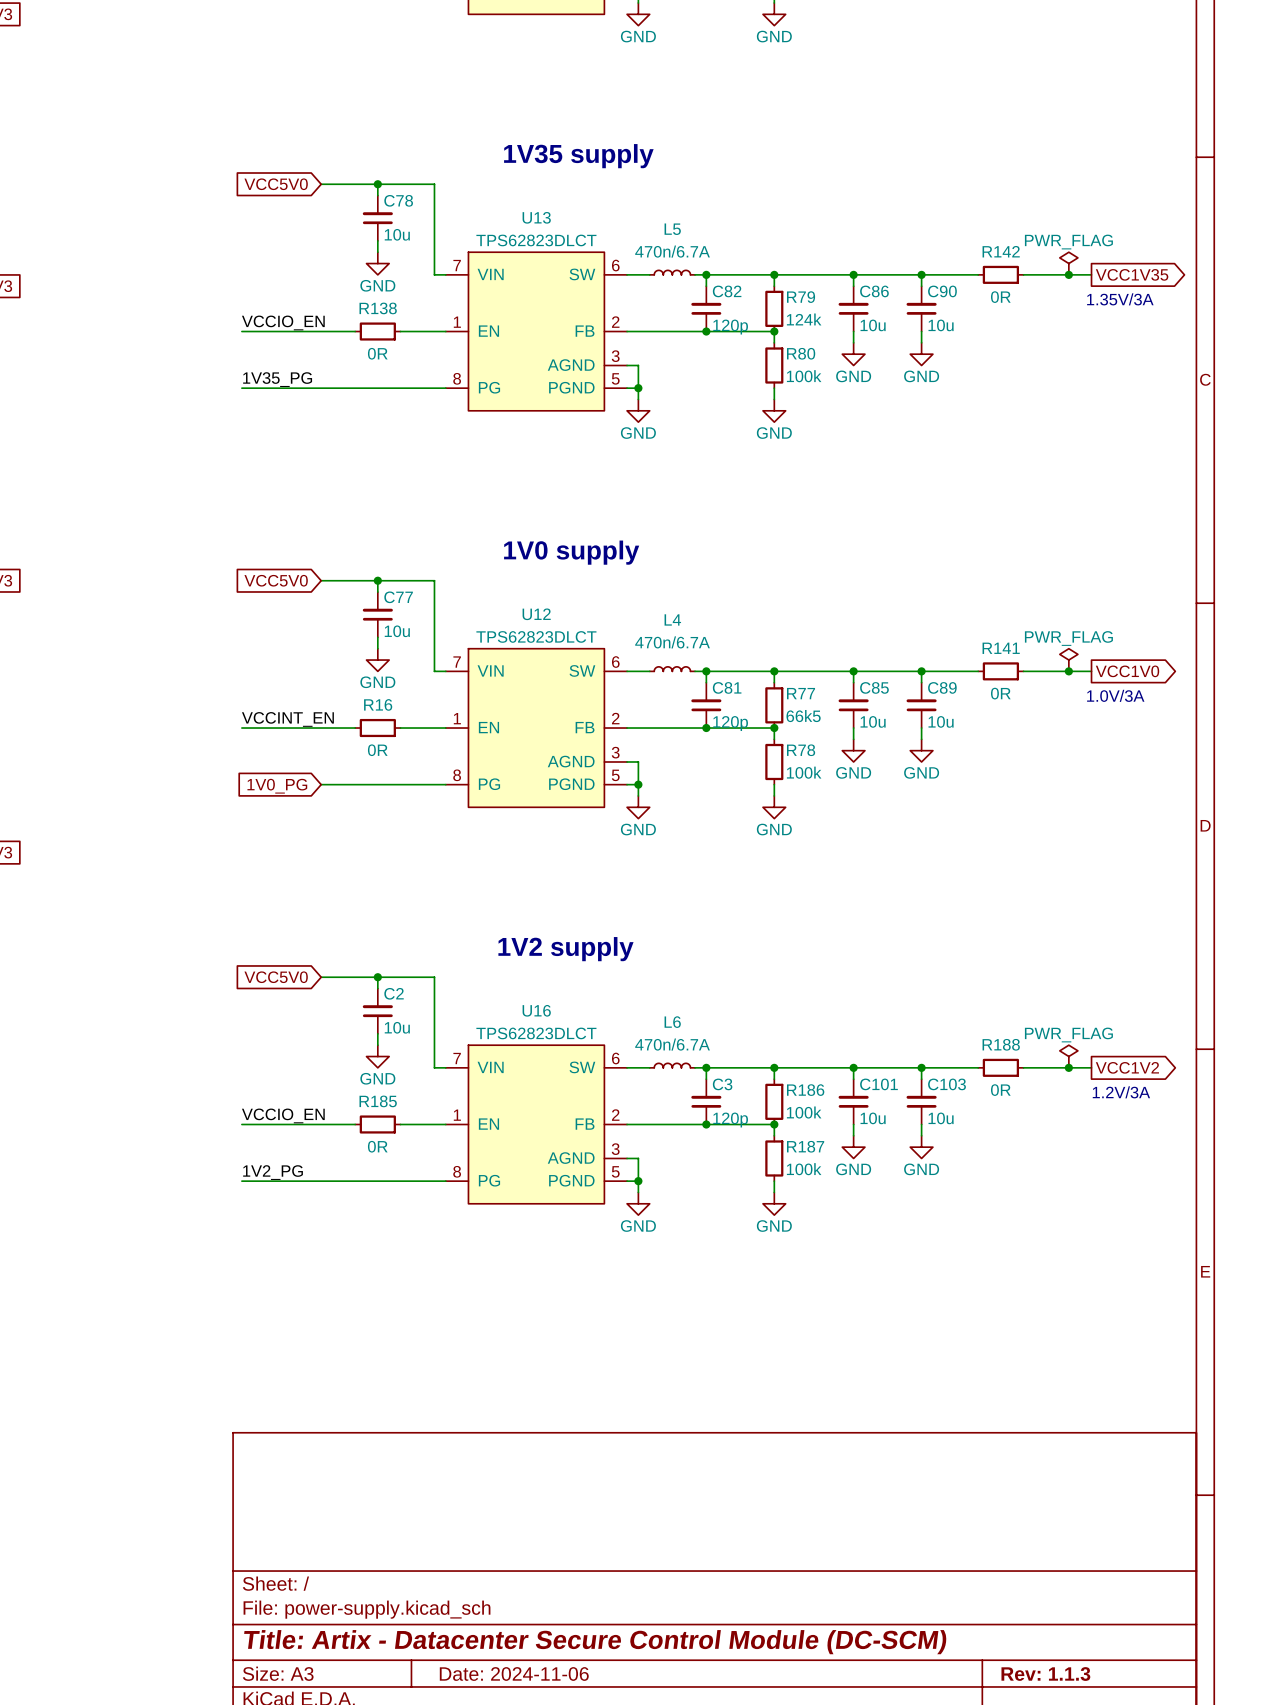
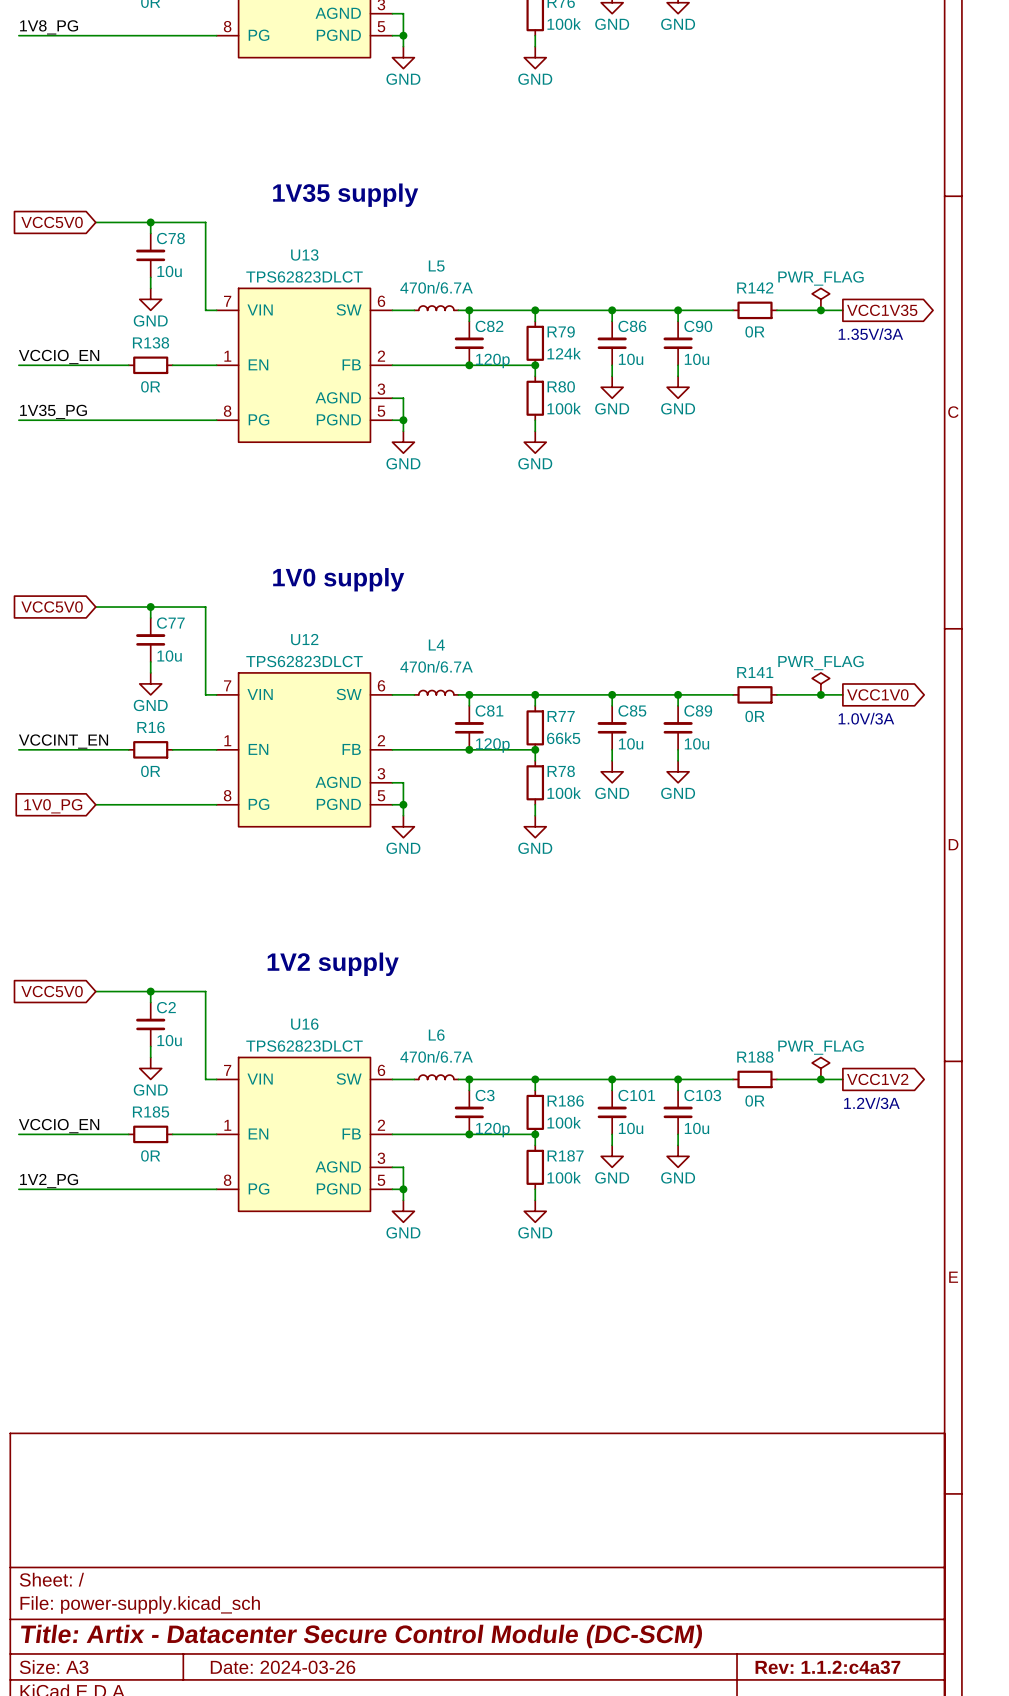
title block: Date: 2024-11-06 (514, 1673) -> Date: 2024-03-26 (283, 1667)
title block: Rev: 1.1.3 (1045, 1674) -> Rev: 1.1.2:c4a37 (827, 1667)

